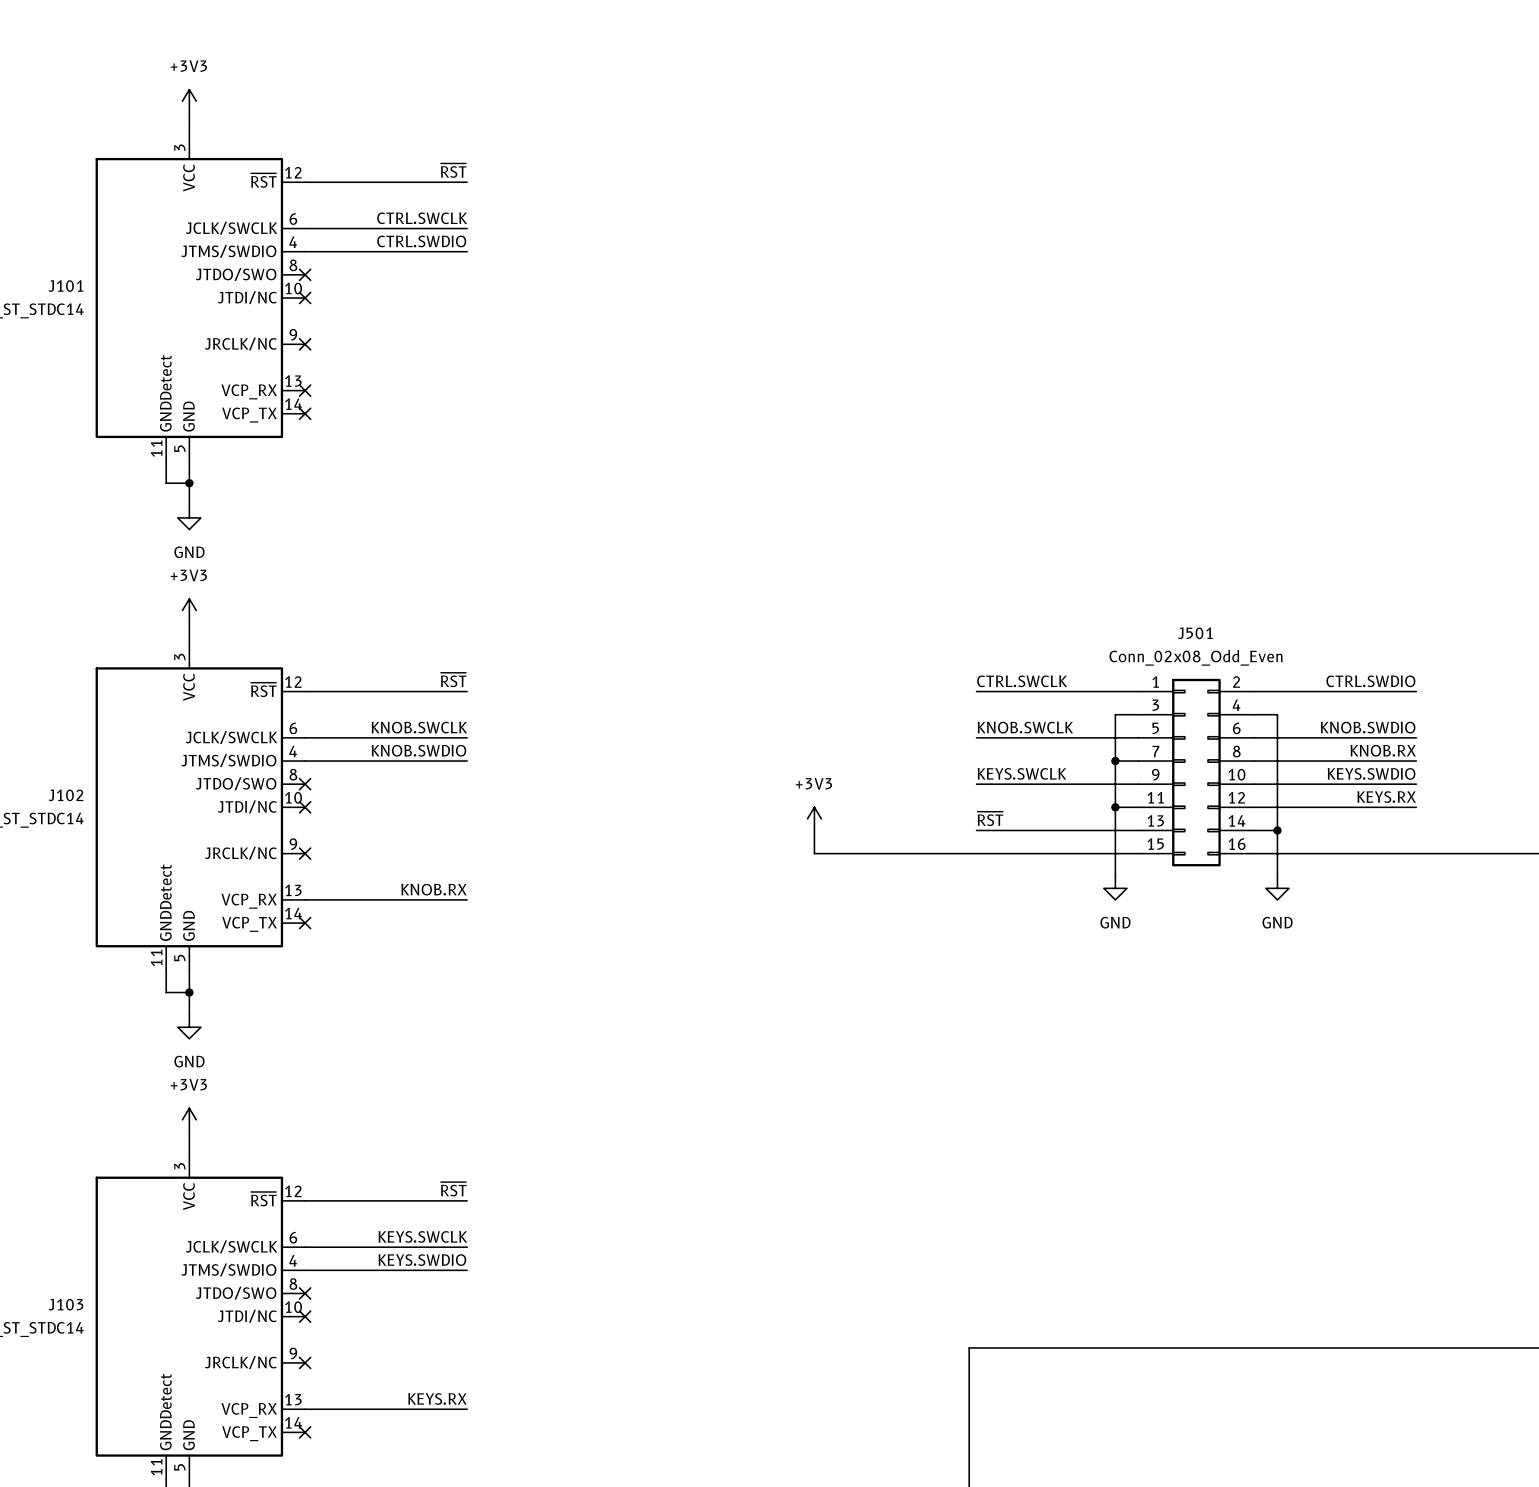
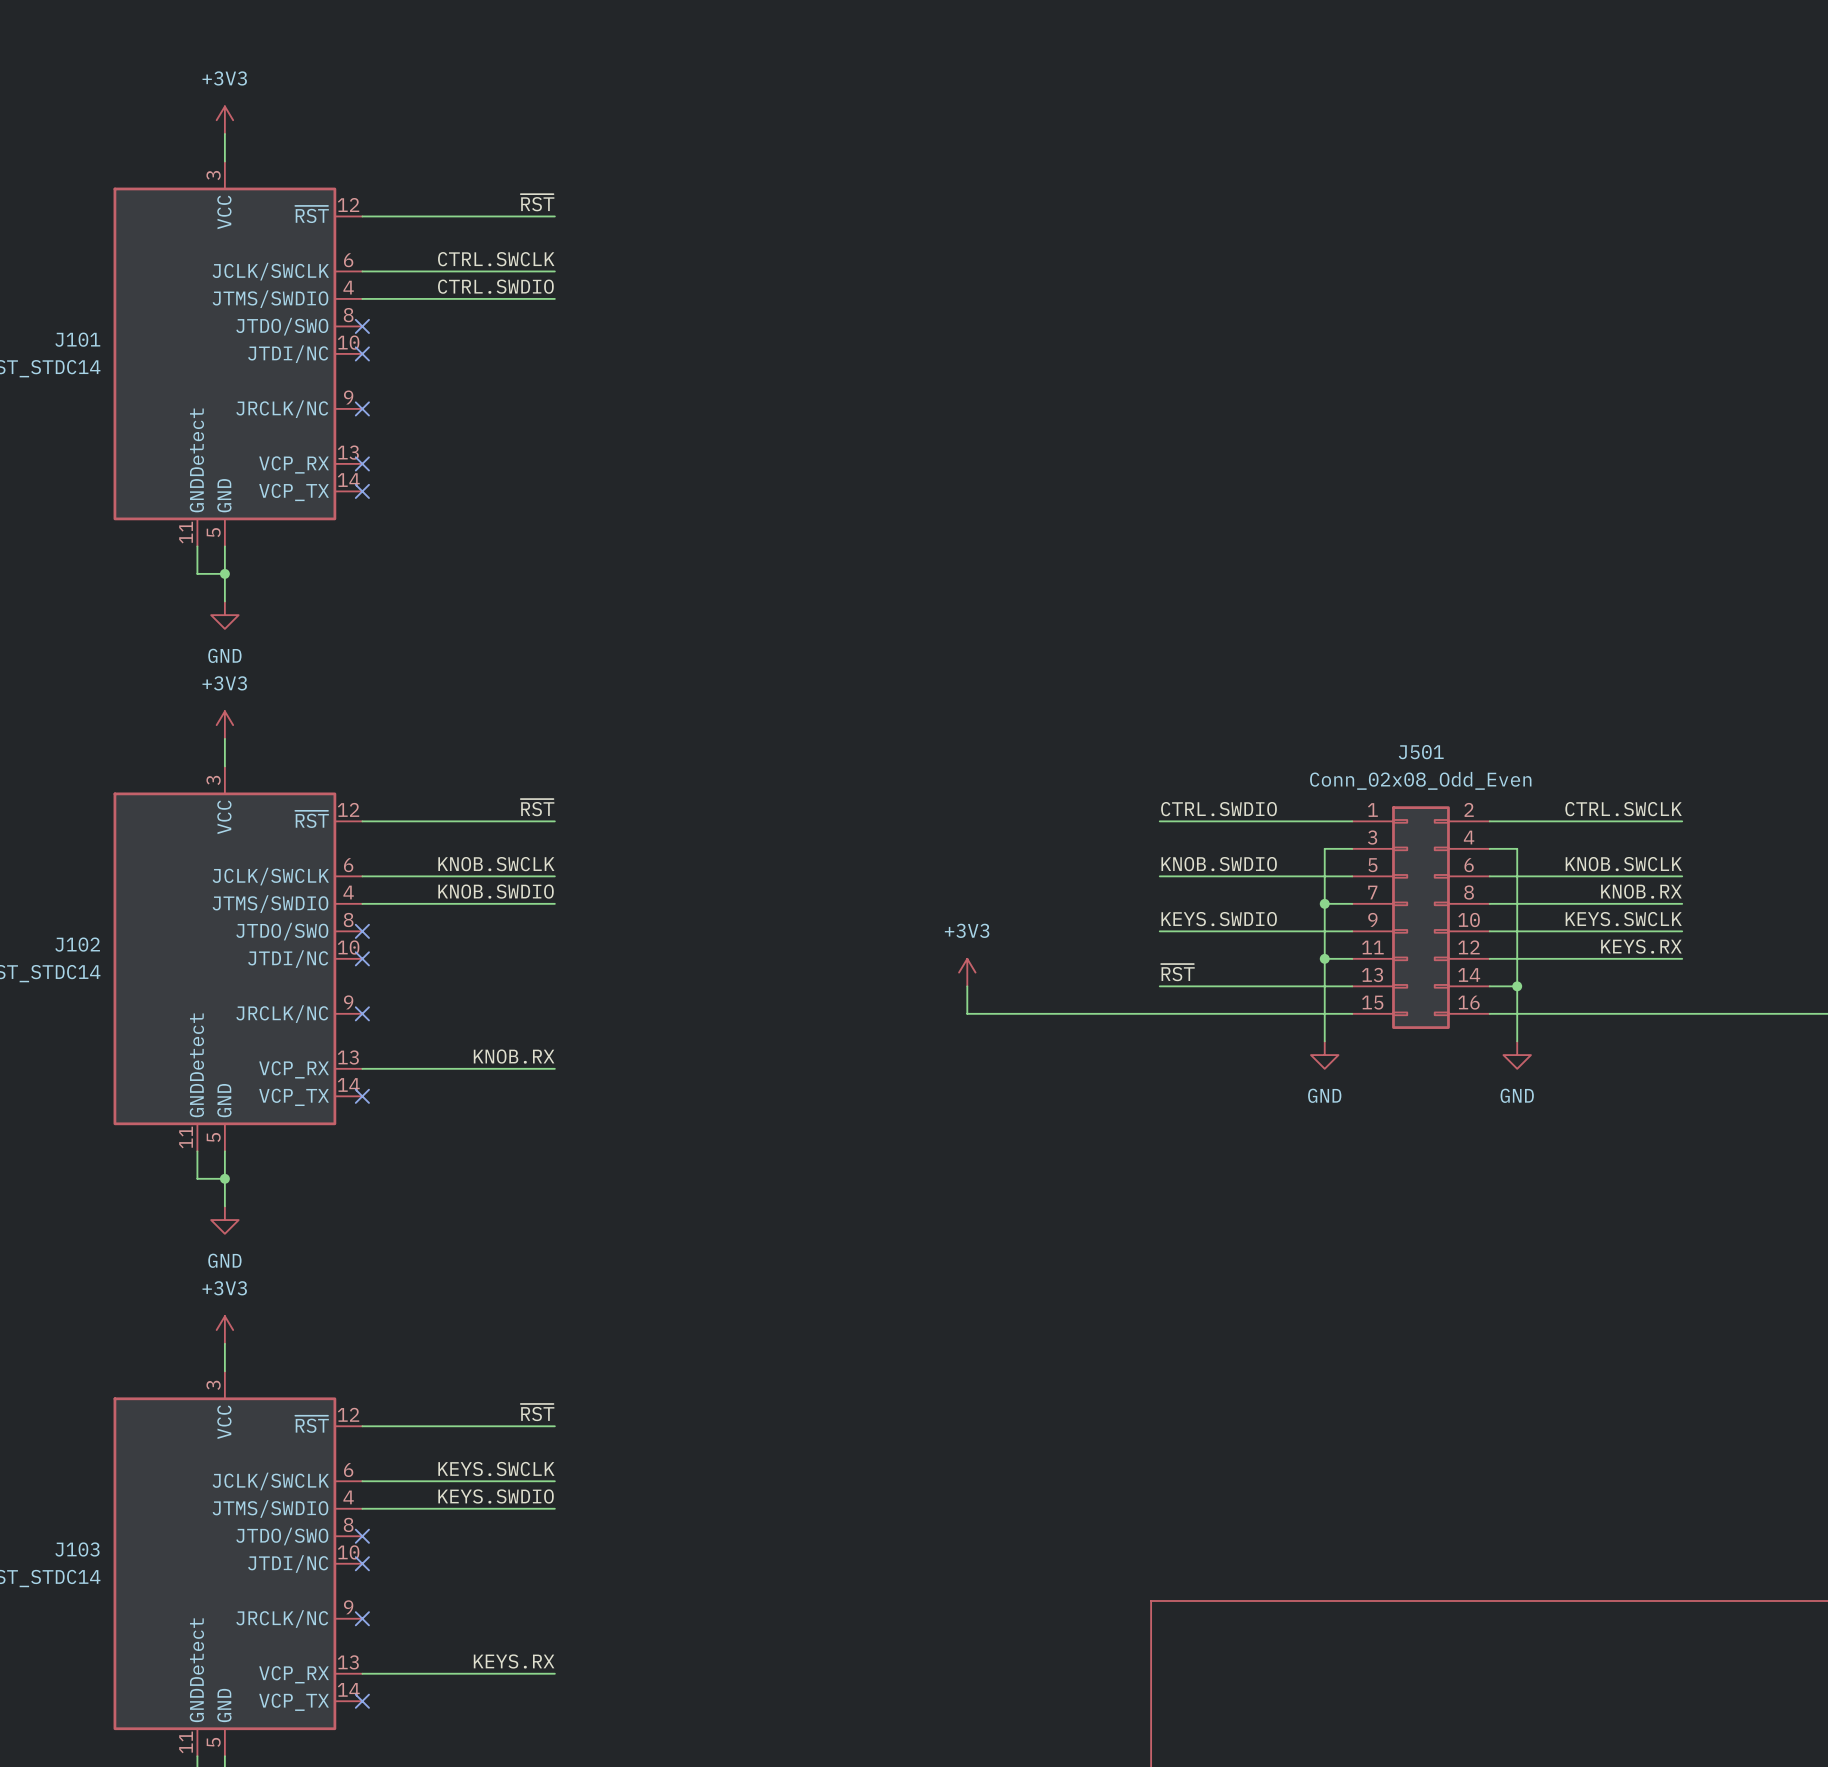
label: CTRL.SWCLK (1022, 681) -> CTRL.SWDIO (1218, 809)
label: CTRL.SWDIO (1370, 681) -> CTRL.SWCLK (1623, 809)
label: KNOB.SWCLK (1025, 727) -> KNOB.SWDIO (1219, 864)
label: KNOB.SWDIO (1368, 727) -> KNOB.SWCLK (1623, 864)
label: KEYS.SWCLK (1021, 773) -> KEYS.SWDIO (1219, 919)
label: KEYS.SWDIO (1371, 773) -> KEYS.SWCLK (1623, 919)

